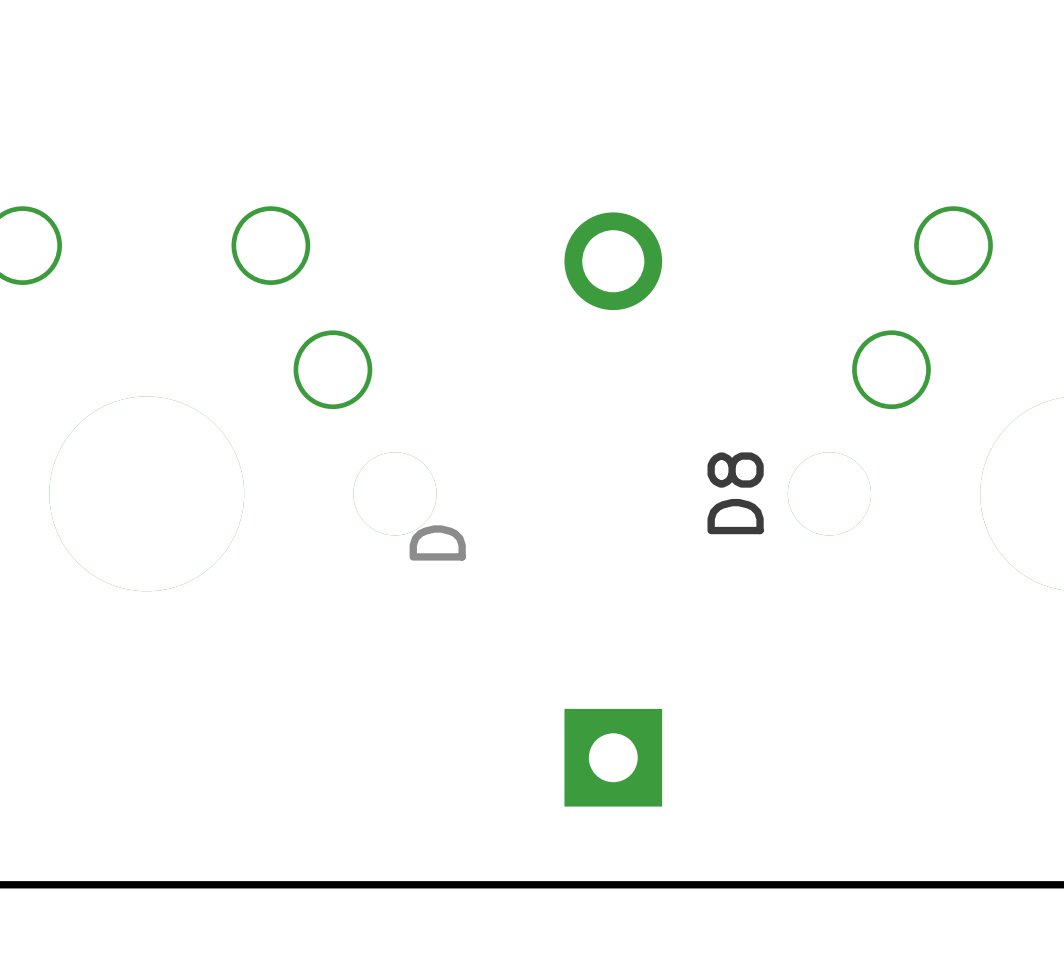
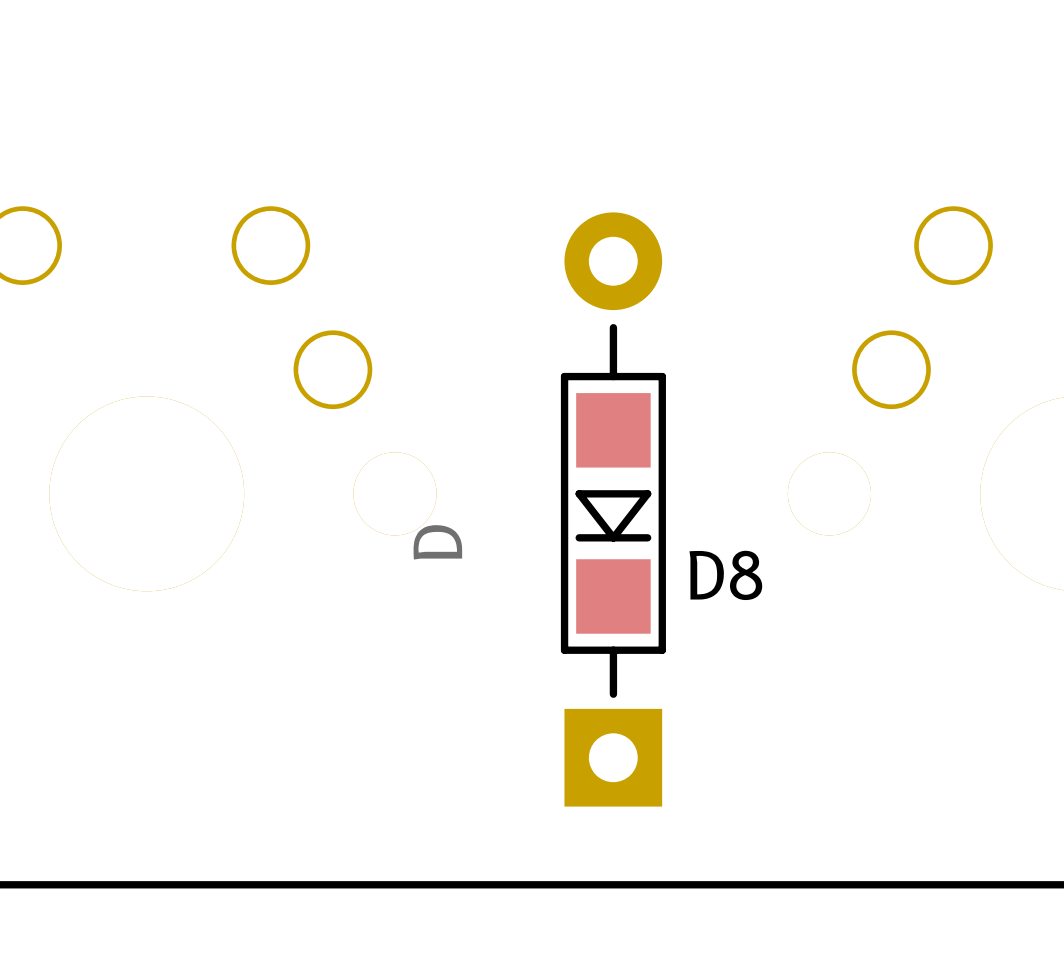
D8 footprint: [564, 212, 663, 807] -> [560, 212, 666, 807]

